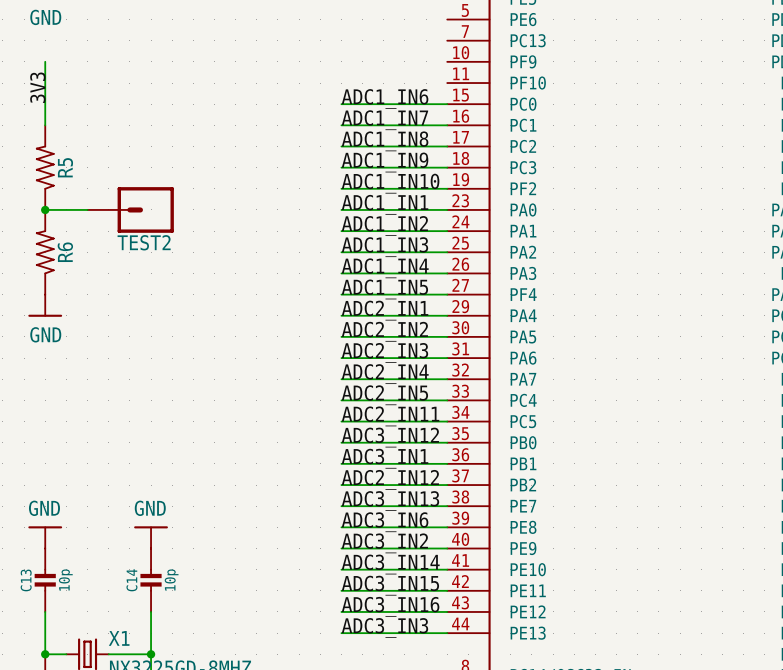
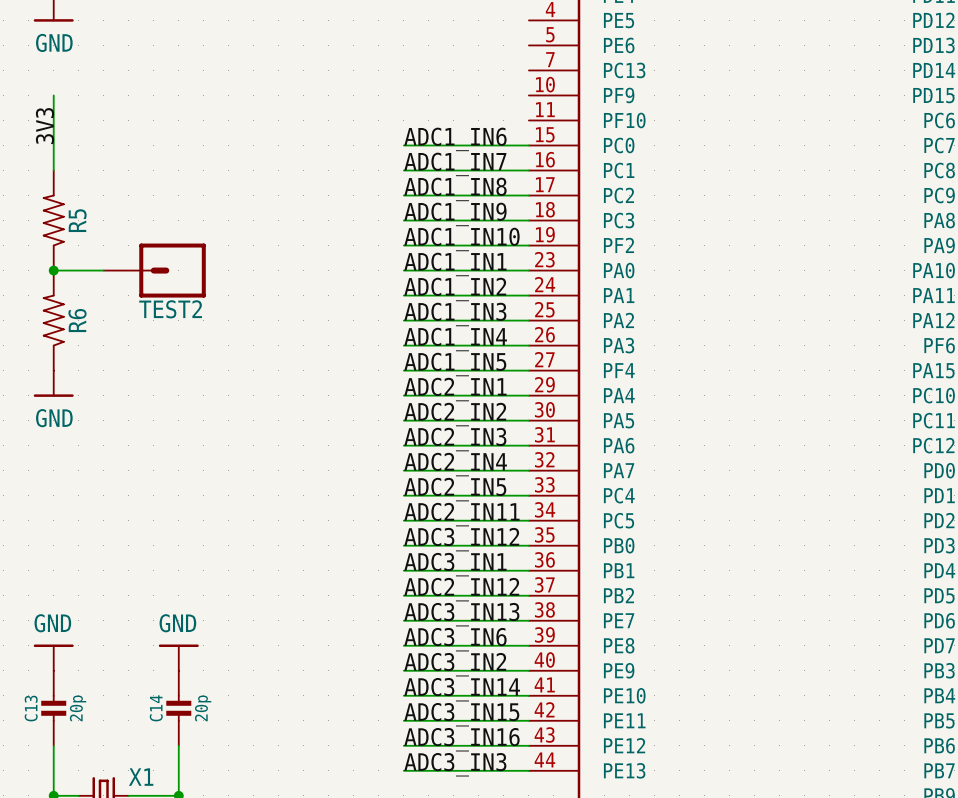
C13 value: 10p (65, 580) -> 20p (78, 708)
C14 value: 10p (171, 580) -> 20p (203, 708)

